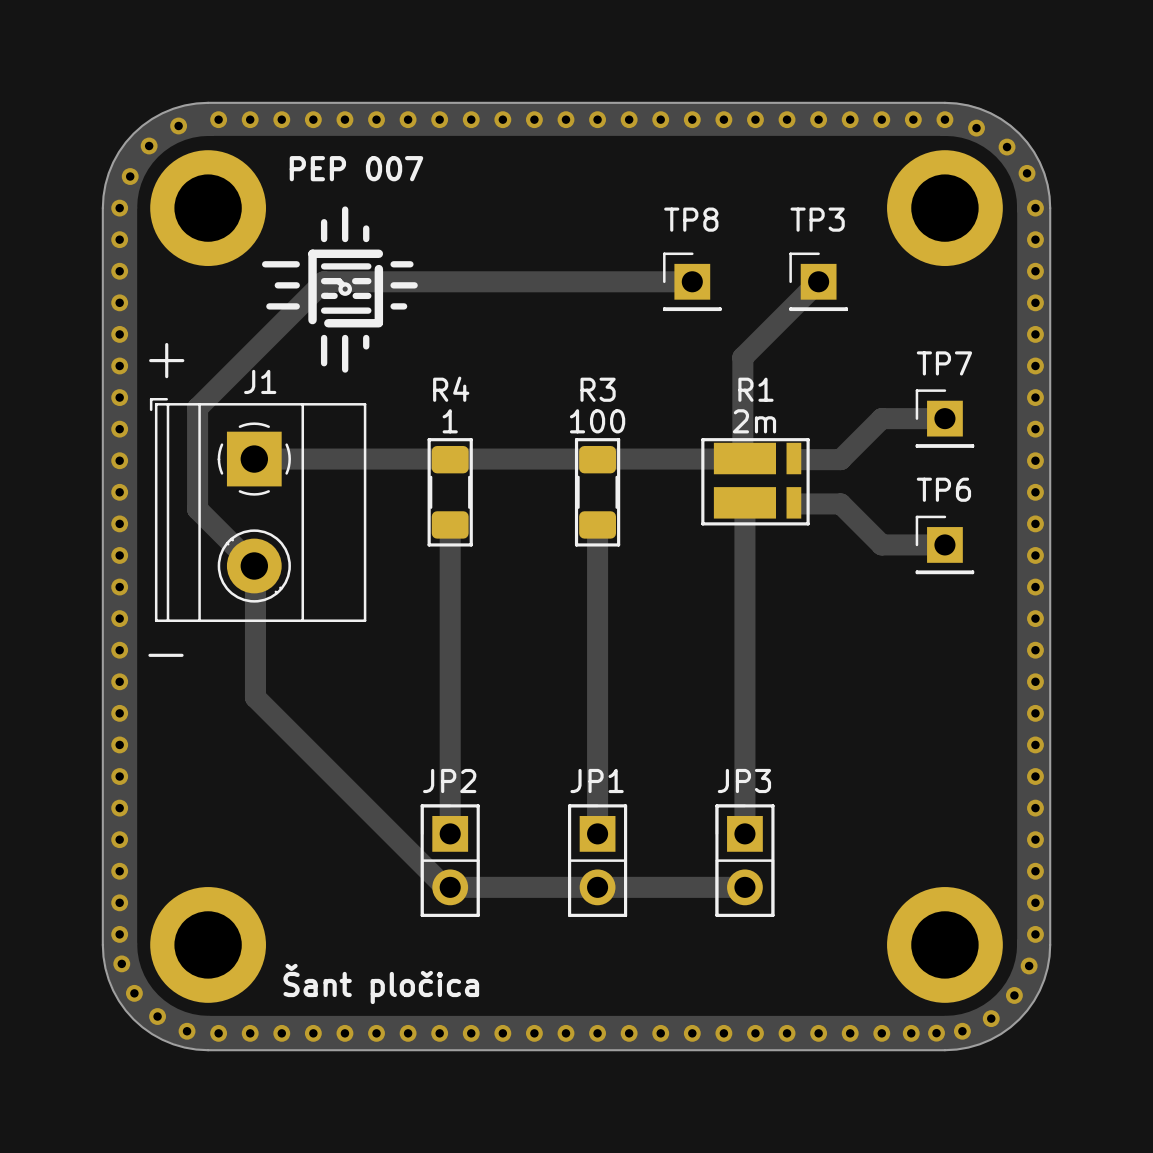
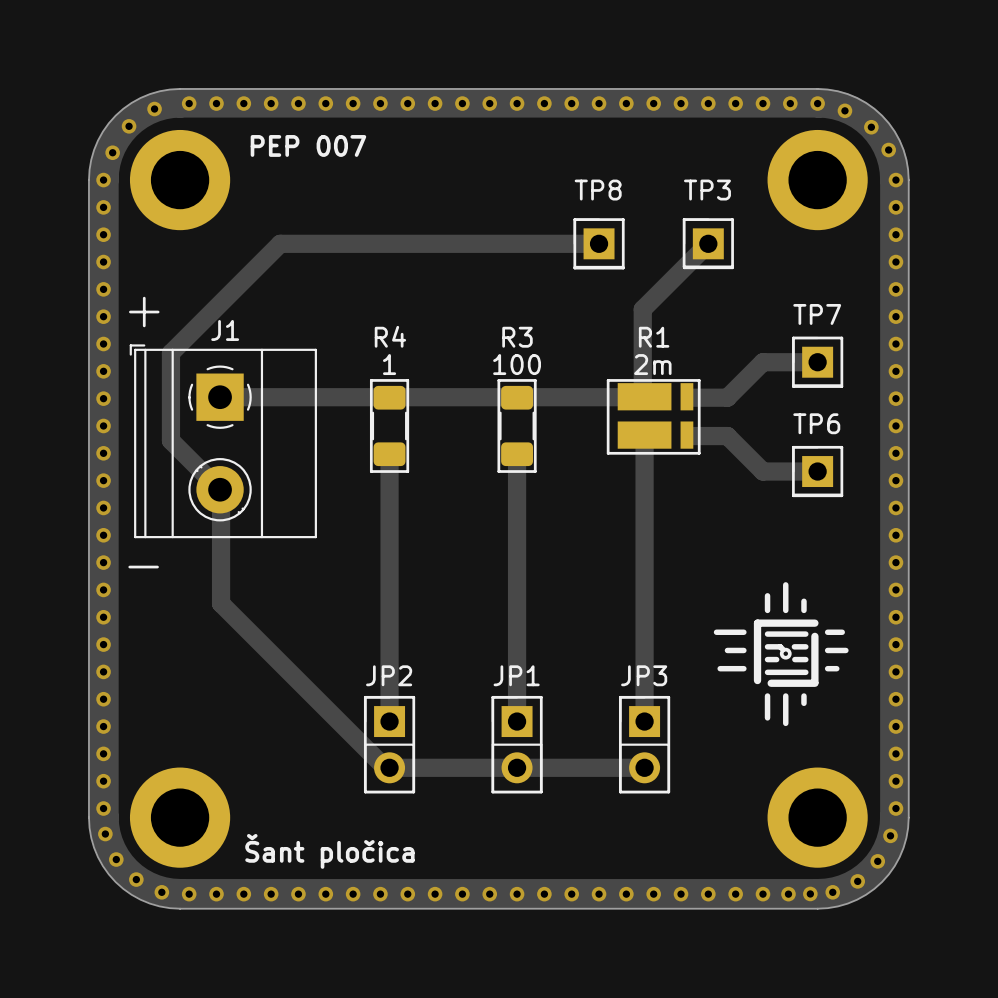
drawing: [262, 206, 418, 373] -> none
line: none -> (574, 219) (623, 219) (623, 268) (574, 268) (574, 219)
line: none -> (684, 219) (732, 219) (732, 266) (684, 266) (684, 219)
line: none -> (793, 338) (841, 338) (841, 386) (793, 386) (793, 338)
line: none -> (793, 447) (793, 495) (841, 495) (841, 447) (793, 447)
drawing: none -> [713, 582, 849, 727]

